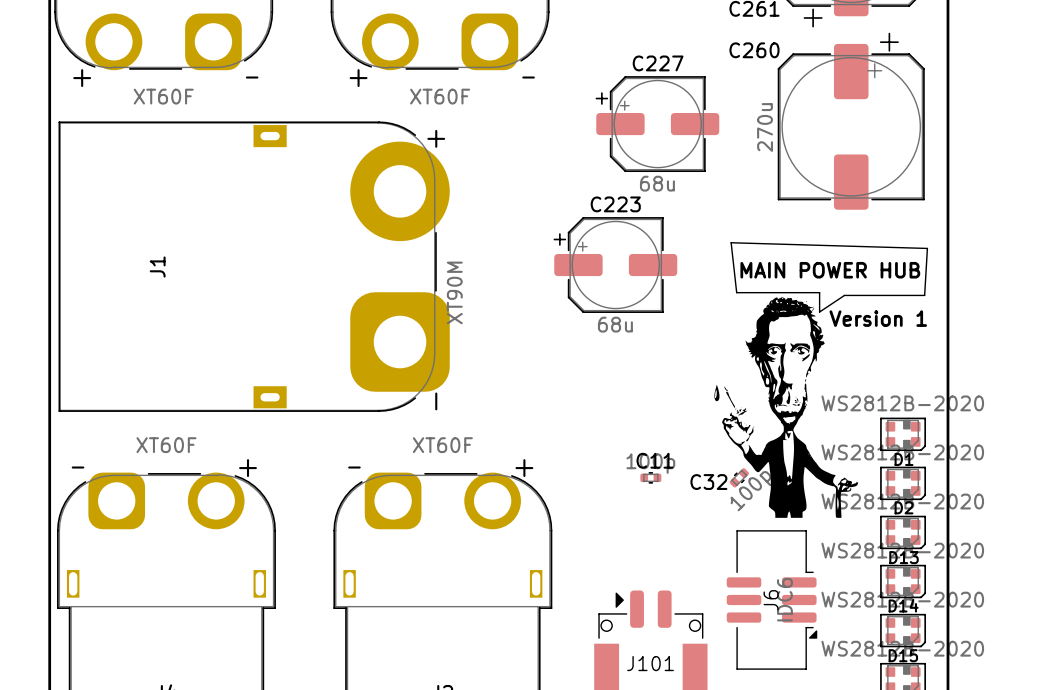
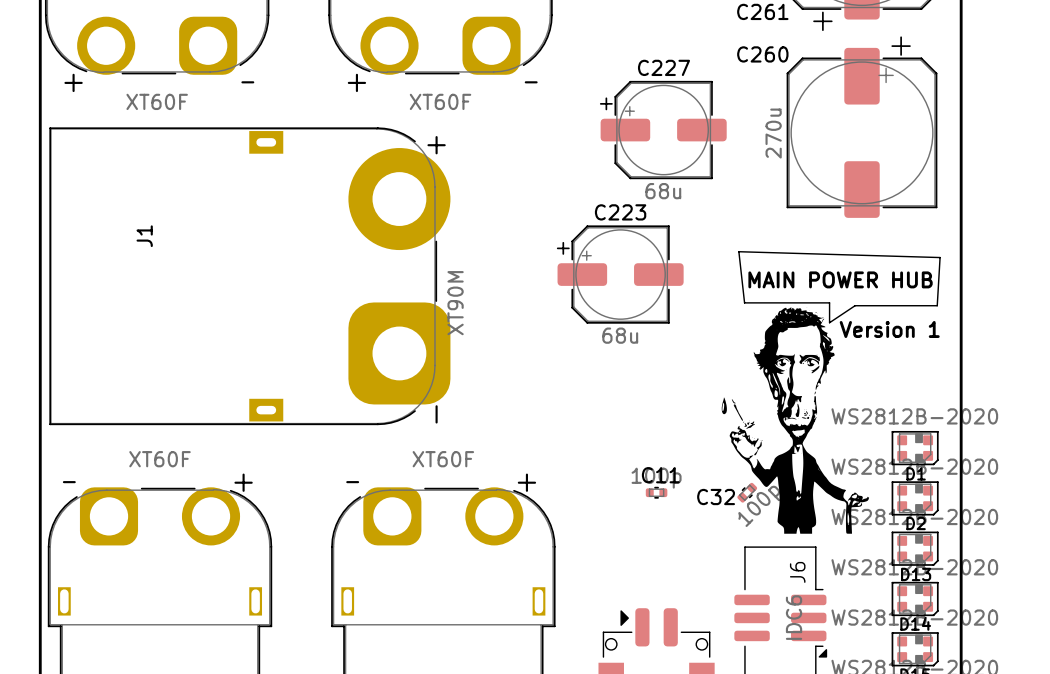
J1 name position: J1 (157, 267) -> J1 (144, 236)
J6 name position: J6 (771, 600) -> J6 (797, 572)

